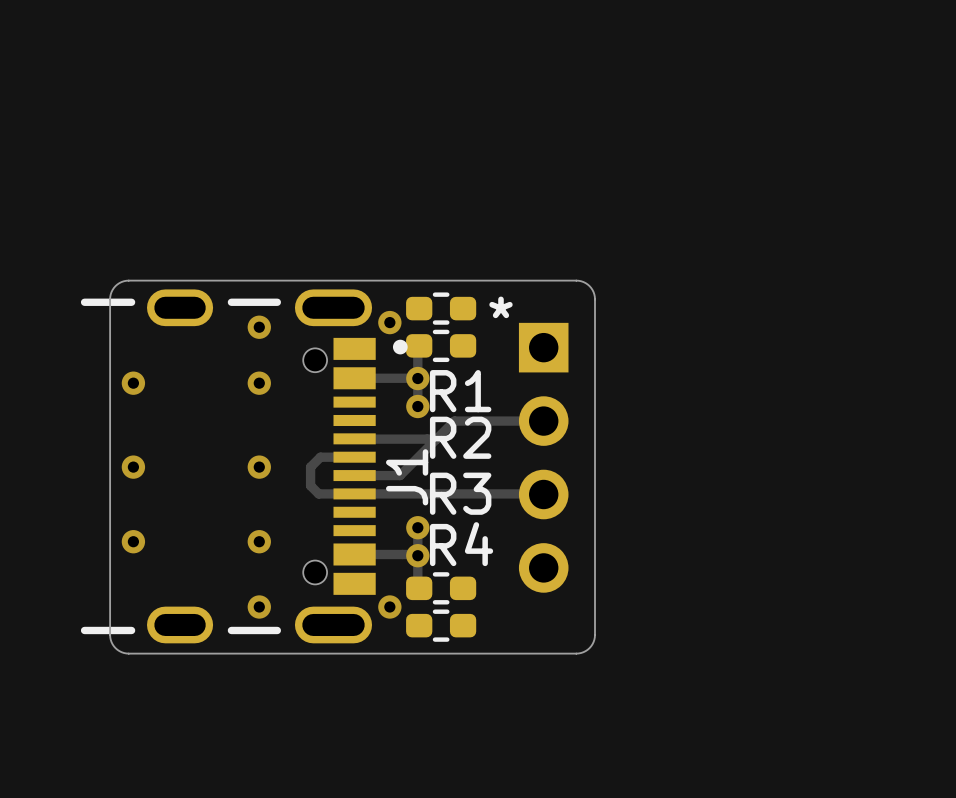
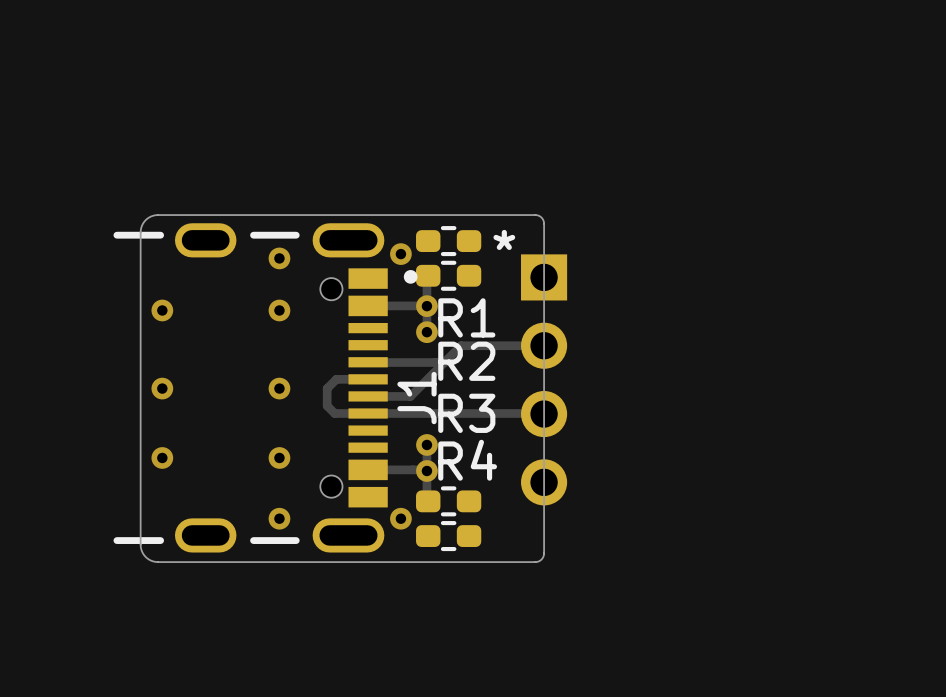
board edge: (534, 280) (581, 281) (591, 287) (595, 299) (594, 637) (589, 648) (581, 652) (534, 653) -> (535, 215) (541, 217) (544, 223) (544, 553) (541, 559) (535, 562)

